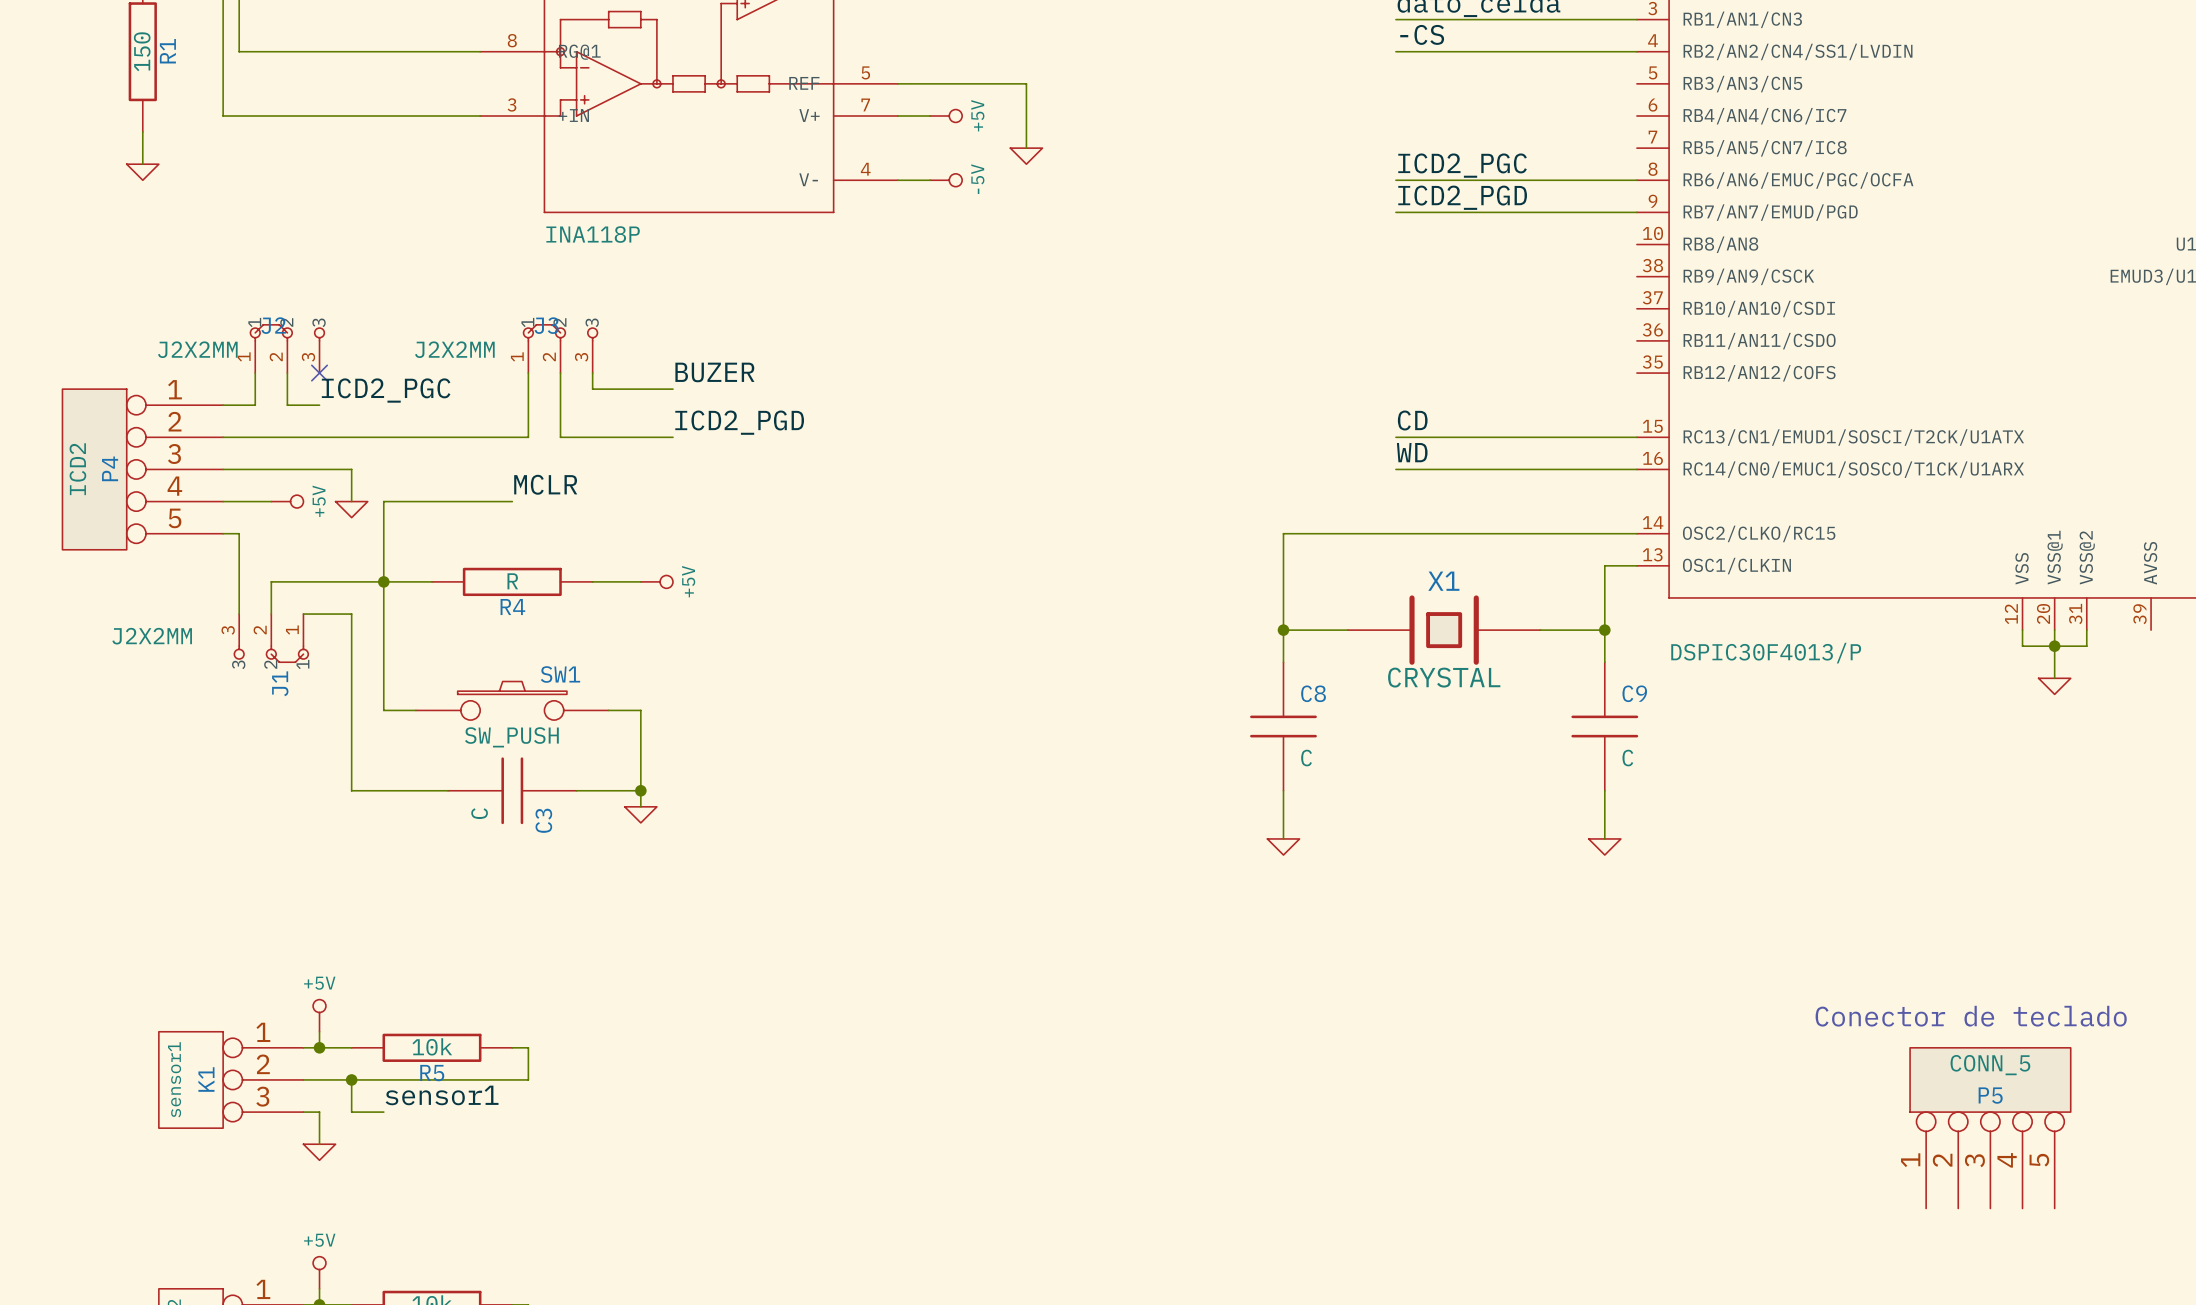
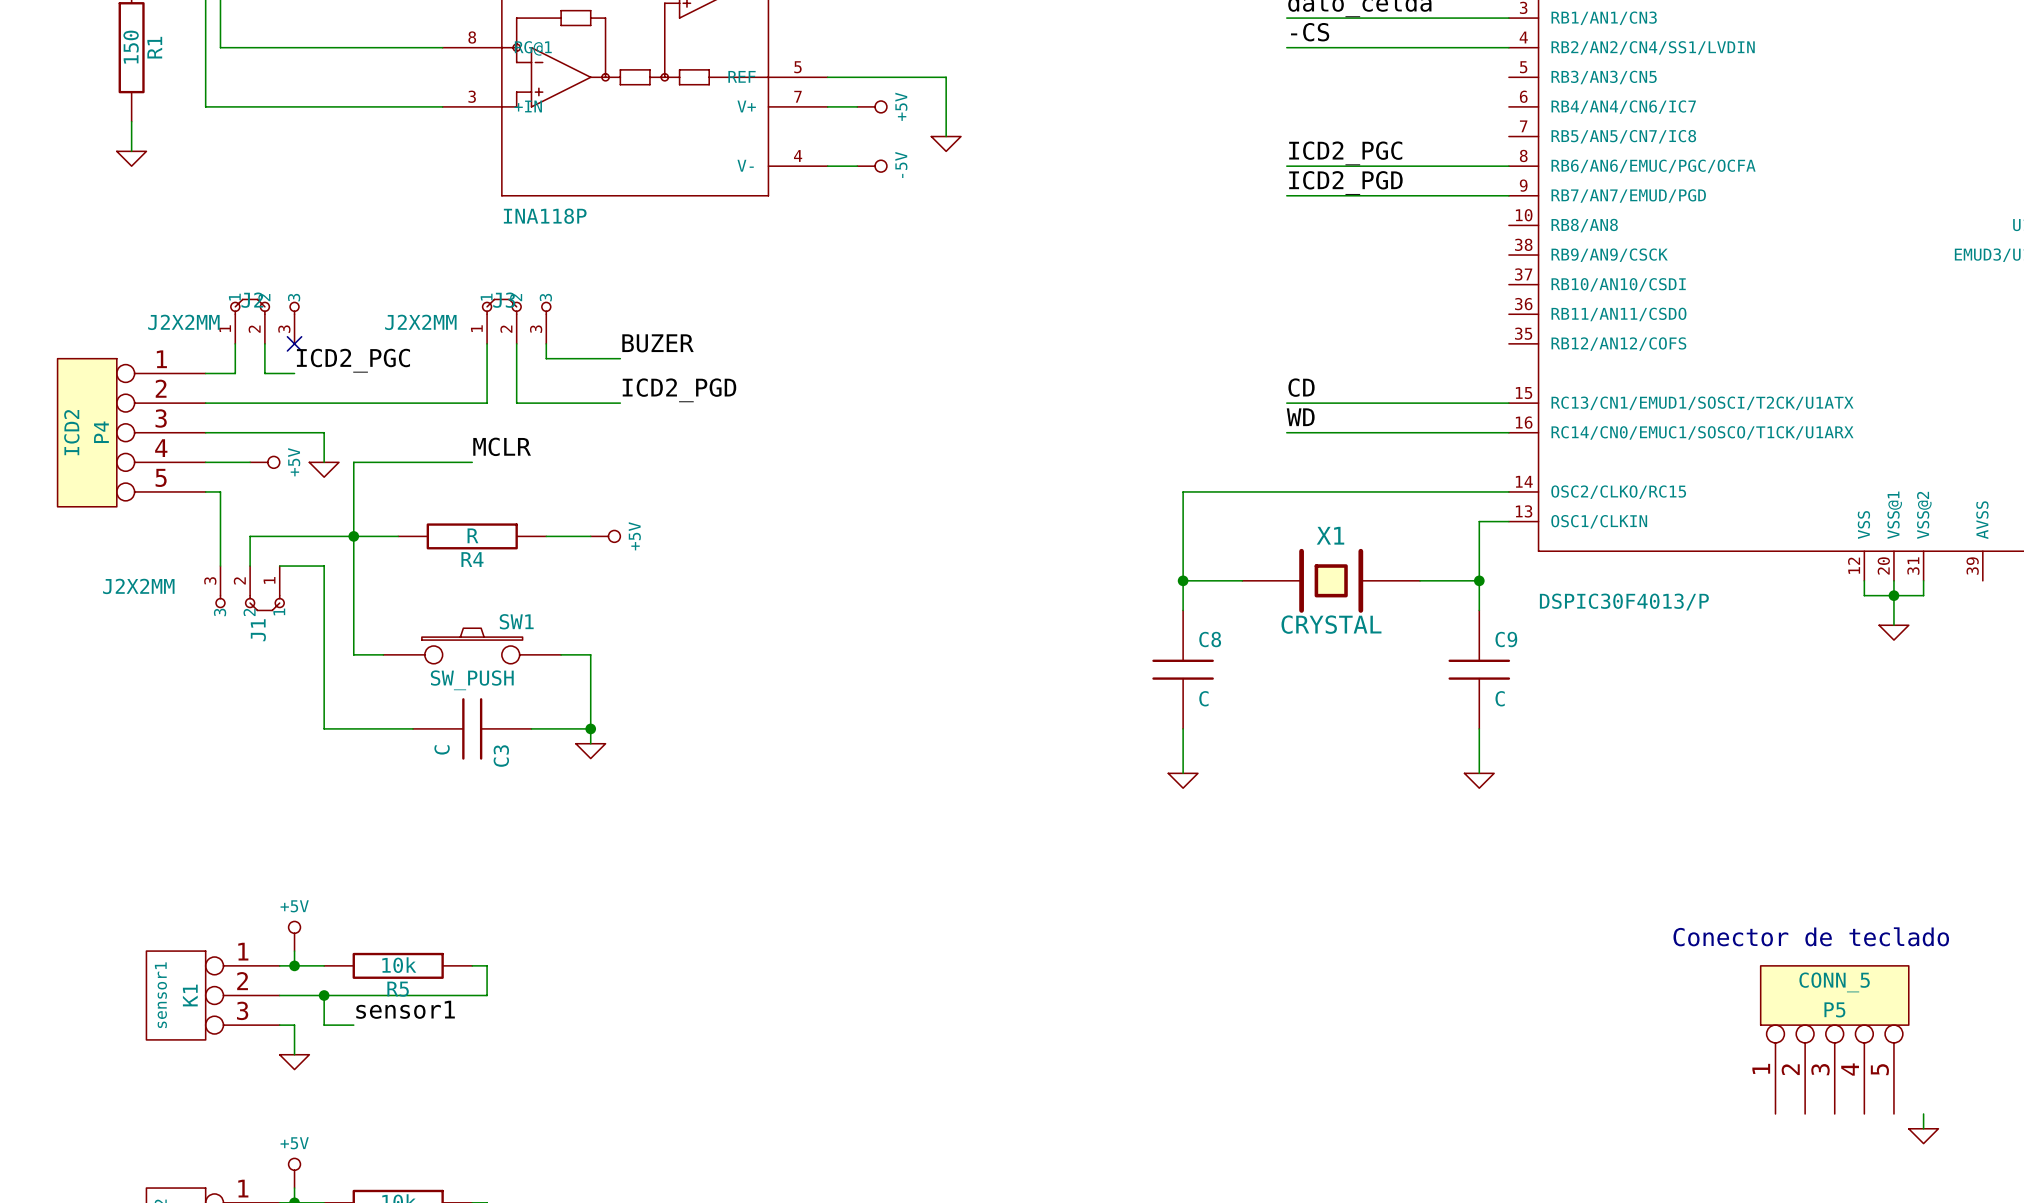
wire: none -> (1923, 1113) (1923, 1128)
power symbol: none -> (1923, 1136)

